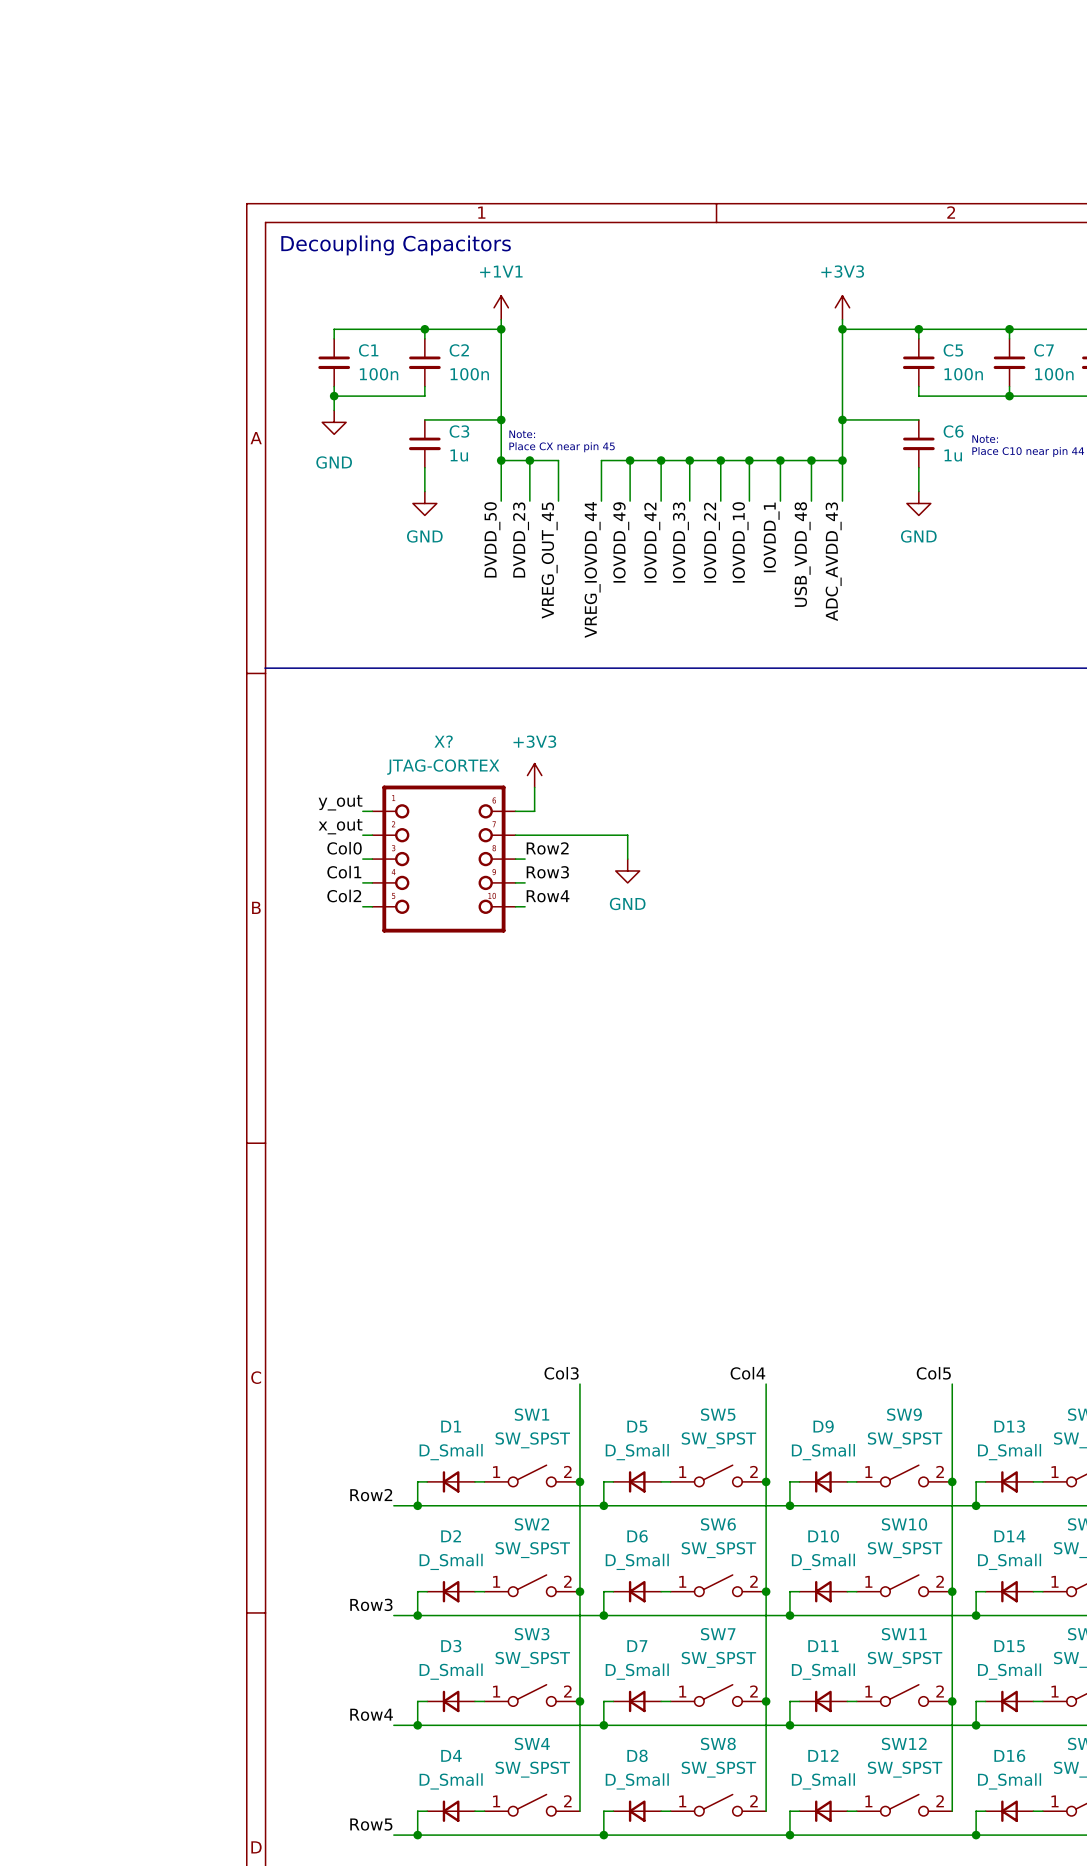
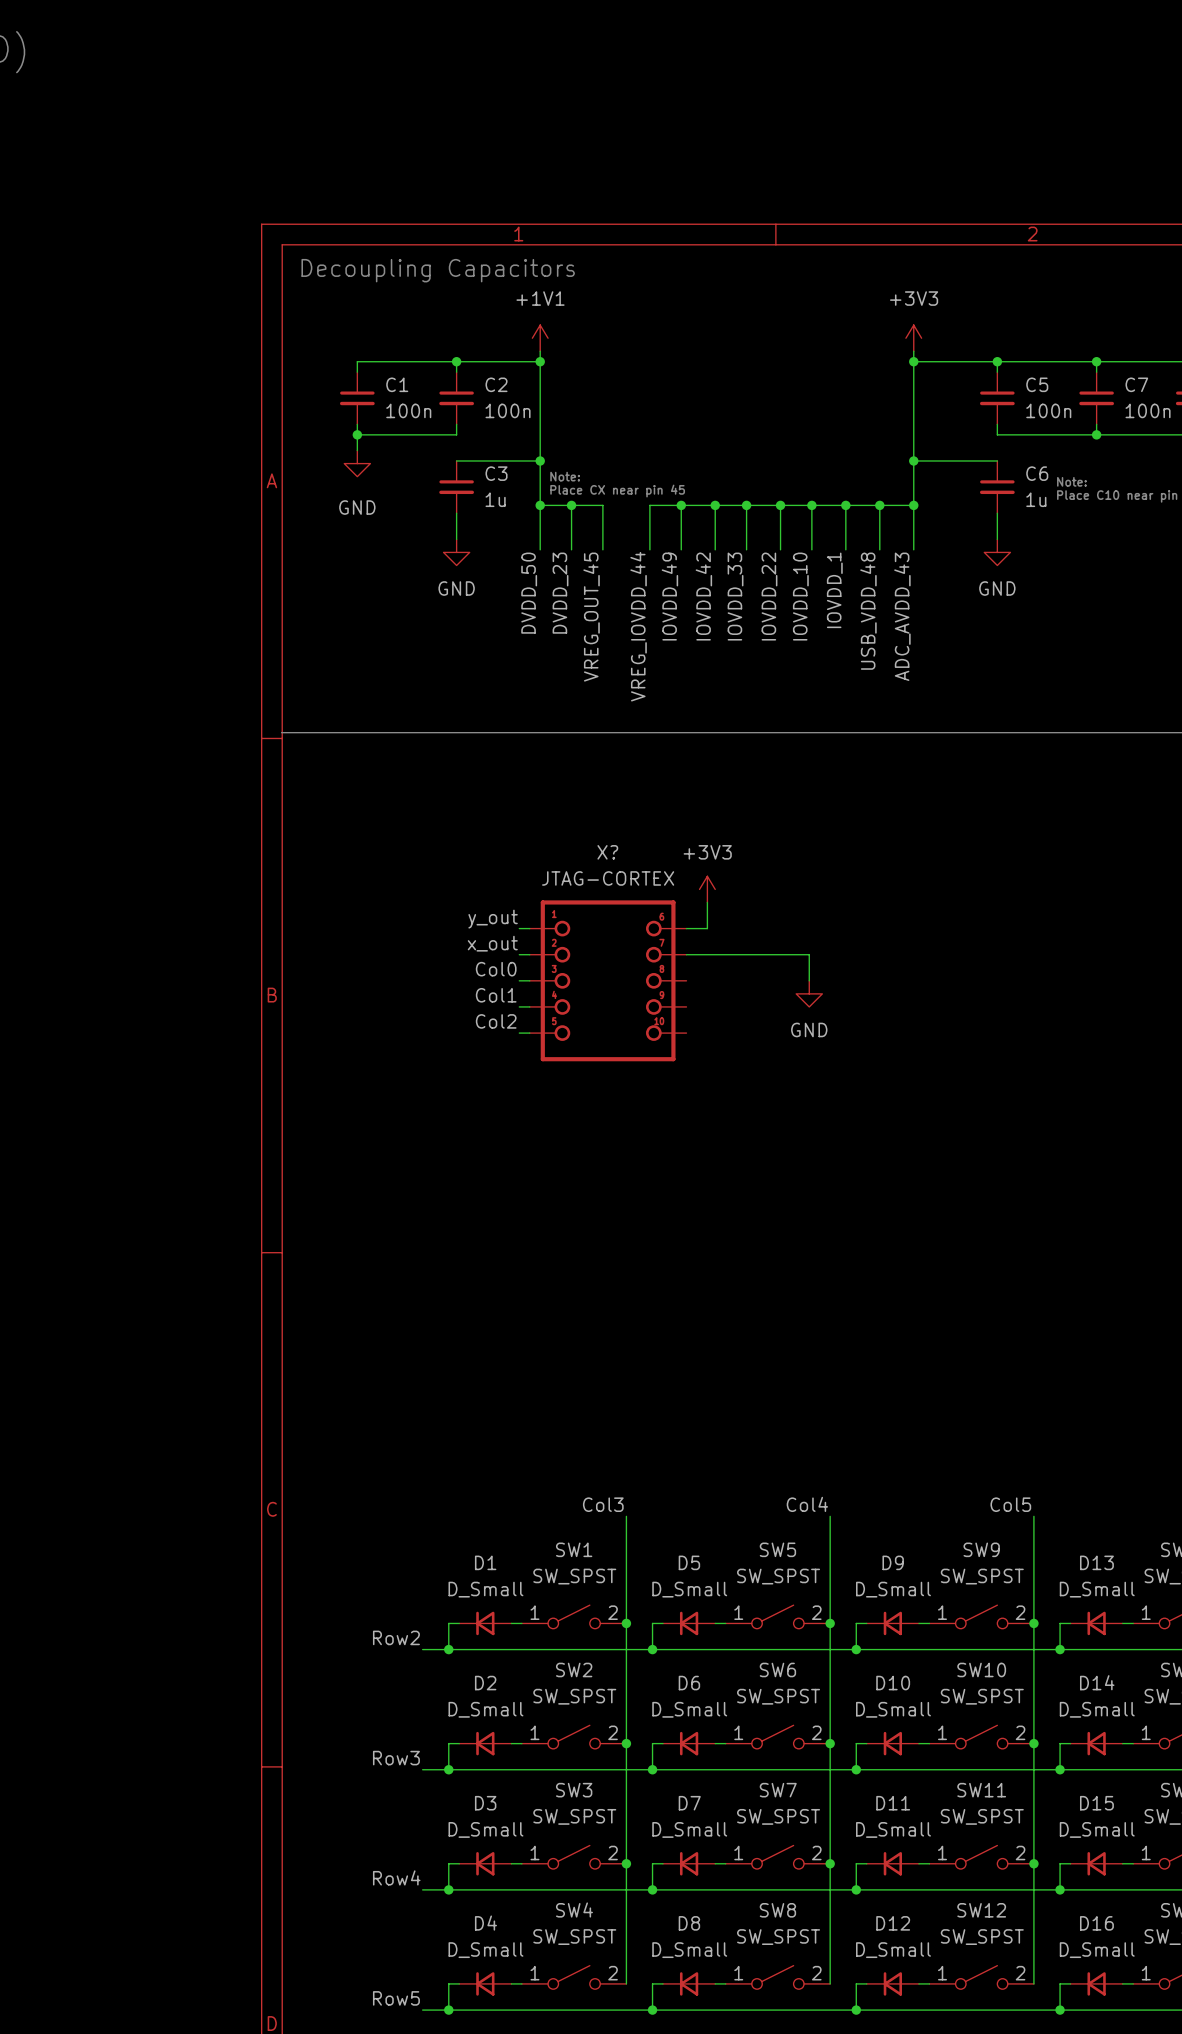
power symbol position: +3V3 (534, 775) -> +3V3 (707, 889)
wire: (534, 787) (534, 811) (515, 811) -> (707, 902) (707, 928) (686, 928)
label position: y_out (340, 802) -> y_out (493, 919)
wire: (362, 811) (372, 811) -> (519, 928) (529, 928)
label position: x_out (340, 826) -> x_out (492, 943)
wire: (362, 835) (372, 835) -> (519, 954) (529, 954)
wire: (515, 835) (627, 835) (627, 859) -> (686, 954) (809, 954) (809, 980)
label position: Col0 (344, 848) -> Col0 (496, 969)
label: Row2 (547, 848) -> none
wire: (362, 859) (372, 859) -> (519, 980) (529, 980)
X? position: (443, 859) -> (608, 980)
wire: (515, 859) (525, 859) -> none
power symbol position: GND (627, 870) -> GND (809, 993)
label position: Col1 (344, 872) -> Col1 (496, 995)
label: Row3 (547, 872) -> none
wire: (362, 882) (372, 882) -> (519, 1006) (529, 1006)
wire: (515, 882) (525, 882) -> none
label position: Col2 (344, 896) -> Col2 (496, 1021)
label: Row4 (548, 896) -> none
wire: (362, 906) (372, 906) -> (519, 1033) (529, 1033)
wire: (515, 906) (525, 906) -> none

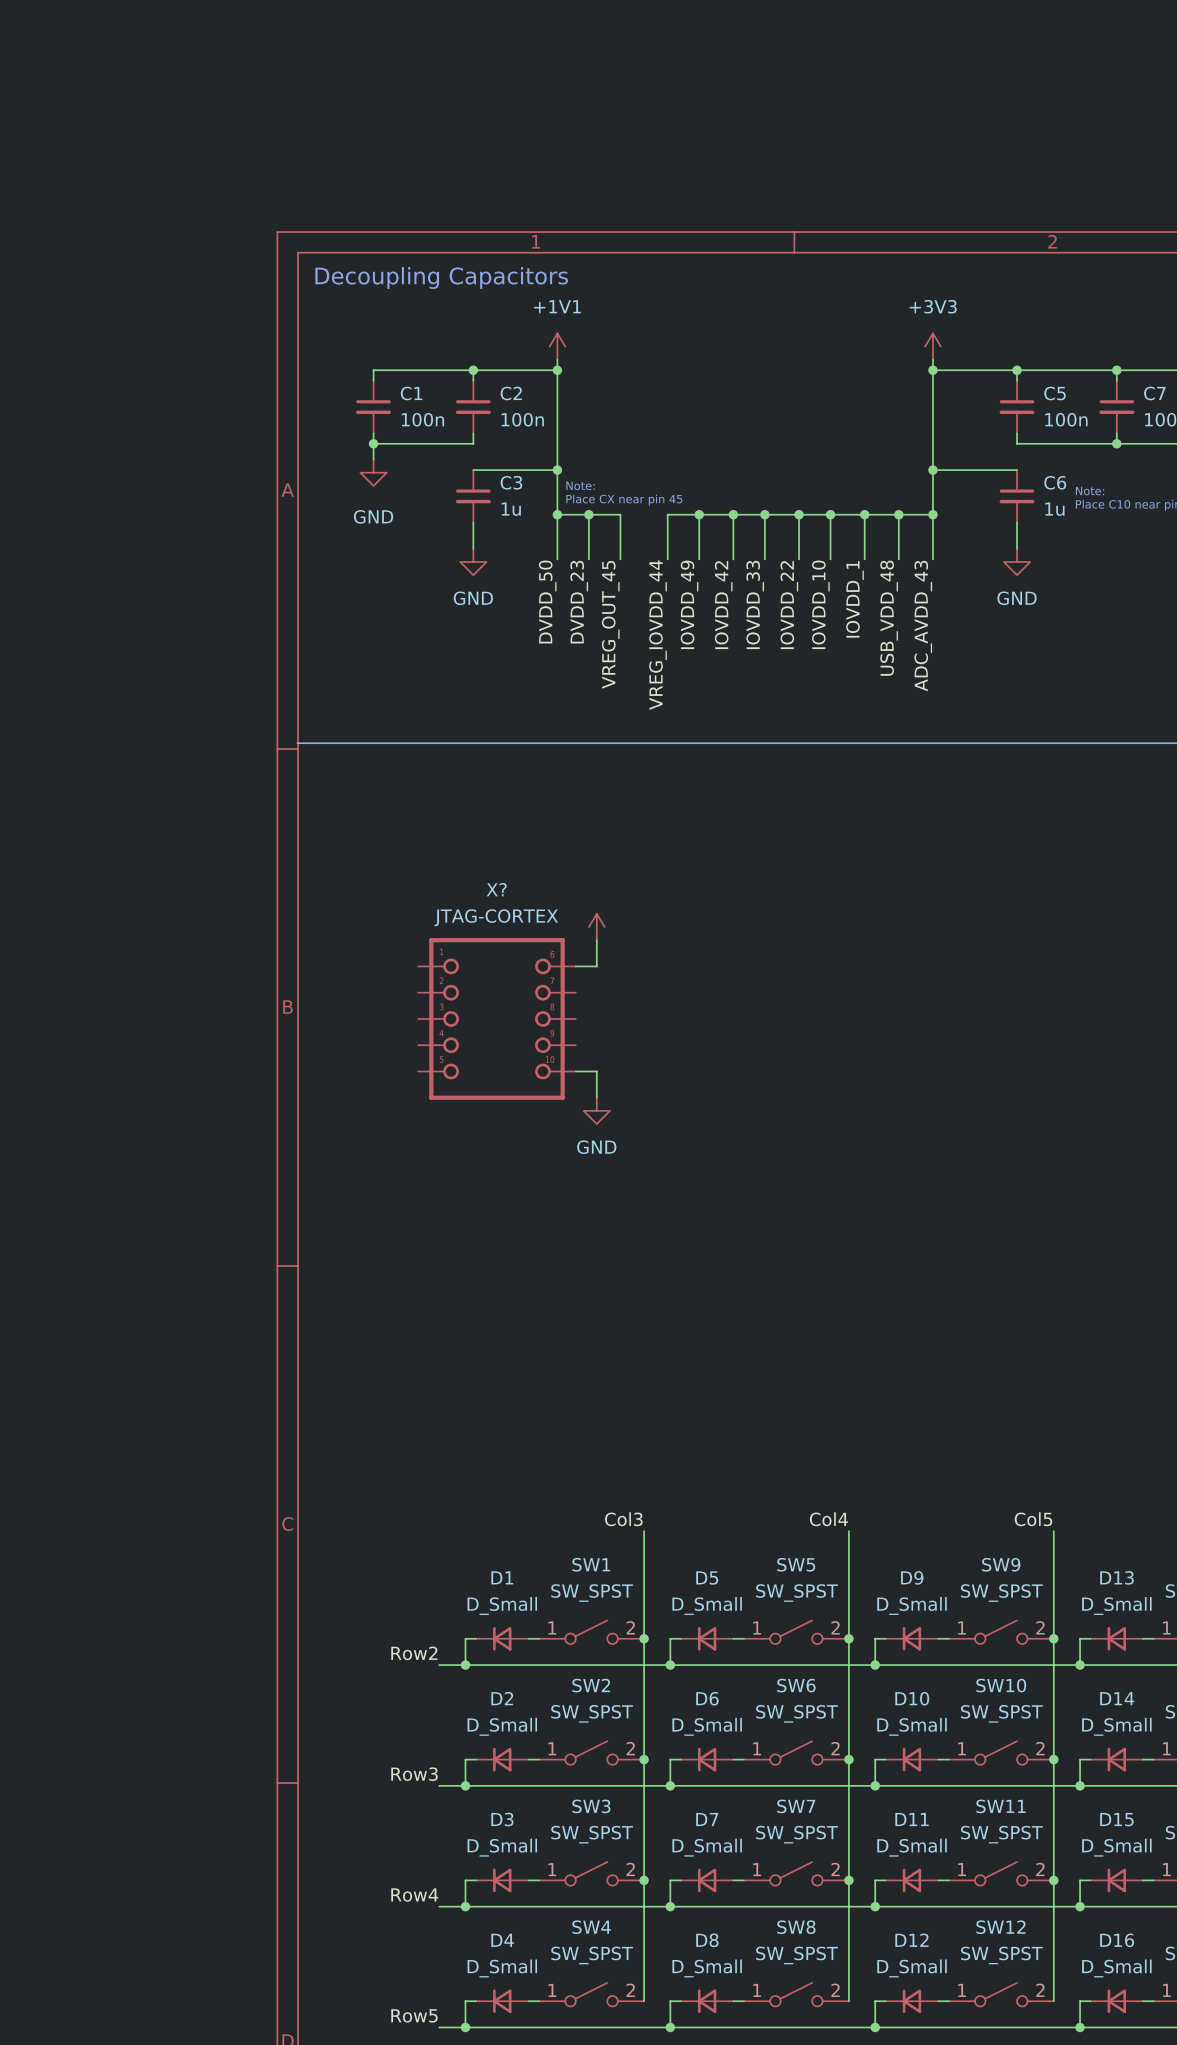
power symbol: +3V3 (707, 889) -> none
wire: (707, 902) (707, 928) (686, 928) -> (596, 940) (596, 966) (575, 966)
power symbol: none -> (596, 927)
label: y_out (493, 919) -> none
label: x_out (492, 943) -> none
wire: (519, 954) (529, 954) -> none
wire: (686, 954) (809, 954) (809, 980) -> none
label: Col0 (496, 969) -> none
wire: (519, 980) (529, 980) -> none
X? position: (608, 980) -> (497, 1018)
power symbol position: GND (809, 993) -> GND (596, 1110)
label: Col1 (496, 995) -> none
wire: (519, 1006) (529, 1006) -> none
label: Col2 (496, 1021) -> none
wire: (519, 1033) (529, 1033) -> none
wire: none -> (575, 1071) (596, 1071) (596, 1097)

